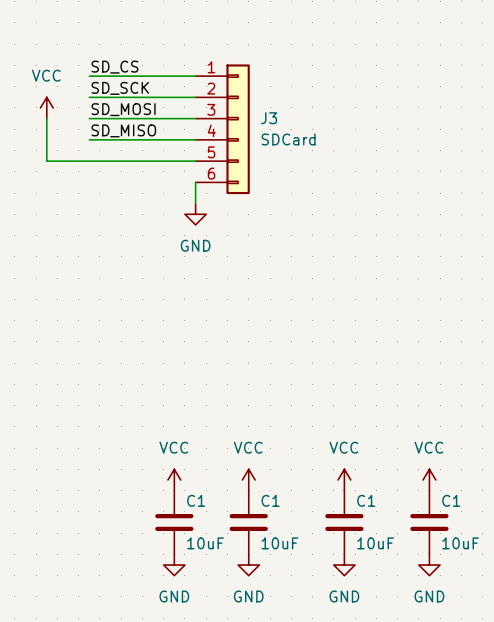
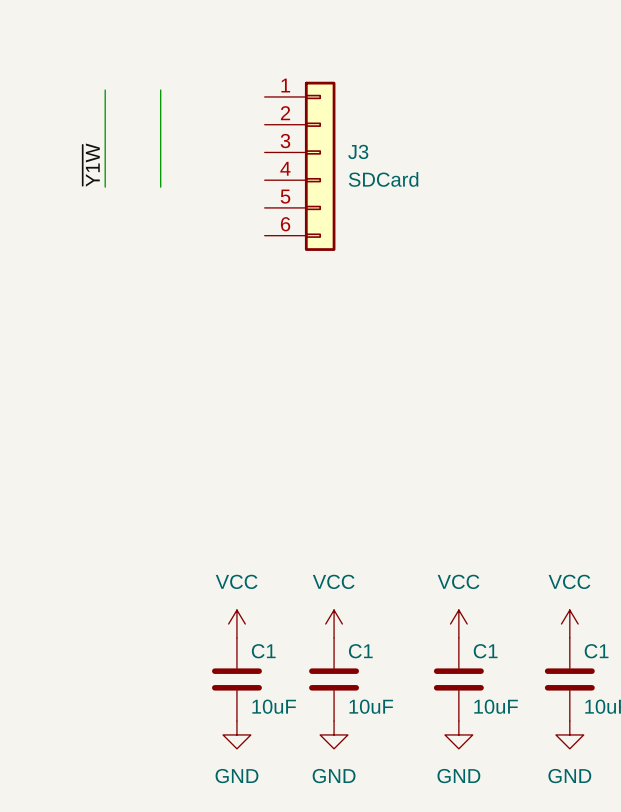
label: SD_CS (114, 67) -> none
wire: none -> (105, 90) (105, 187)
wire: none -> (160, 90) (160, 187)
wire: (89, 76) (195, 76) -> none
label: SD_SCK (120, 88) -> none
wire: (89, 97) (195, 97) -> none
power symbol: VCC (46, 107) -> none
label: SD_MOSI (123, 109) -> none
wire: (46, 118) (46, 161) (195, 161) -> none
wire: (89, 118) (195, 118) -> none
label: none -> ~{Y1W} (91, 165)
label: SD_MISO (123, 130) -> none
wire: (89, 139) (195, 139) -> none
wire: (195, 182) (195, 203) -> none
power symbol: GND (195, 214) -> none

